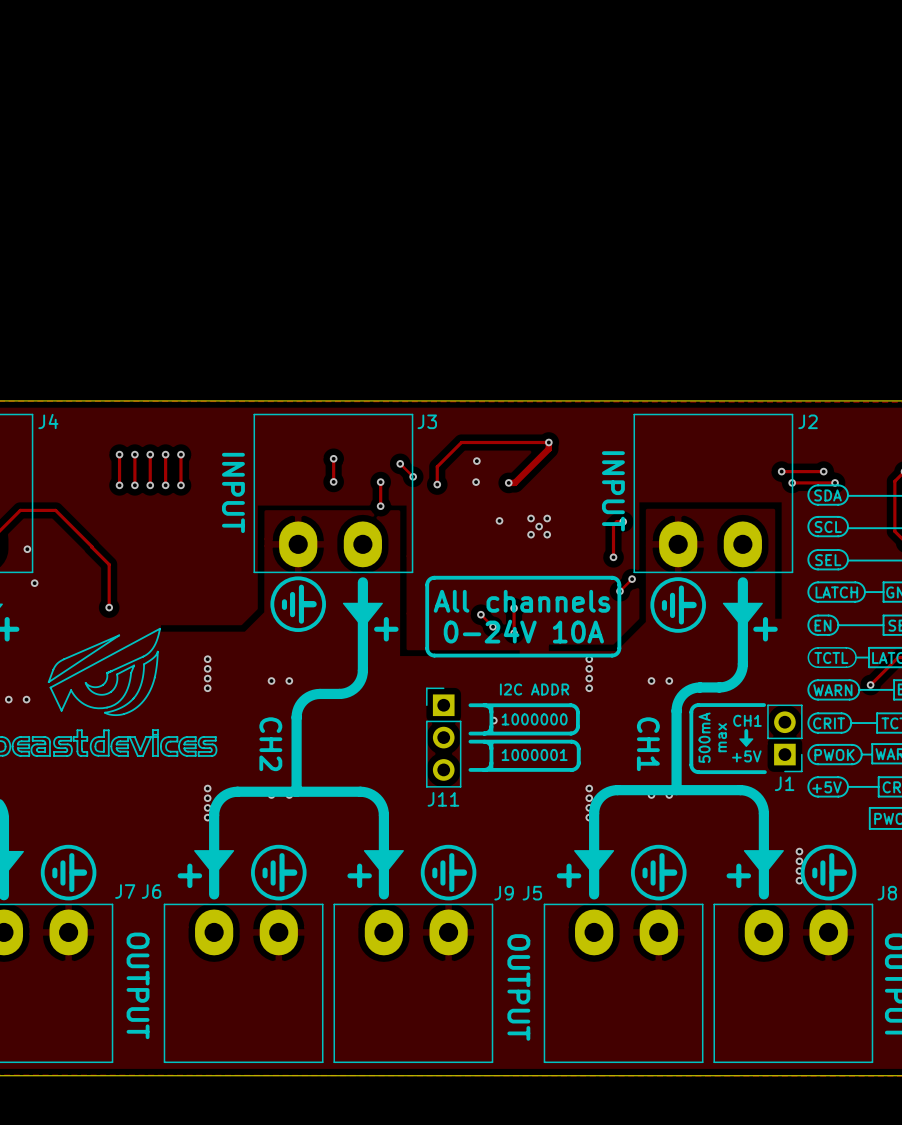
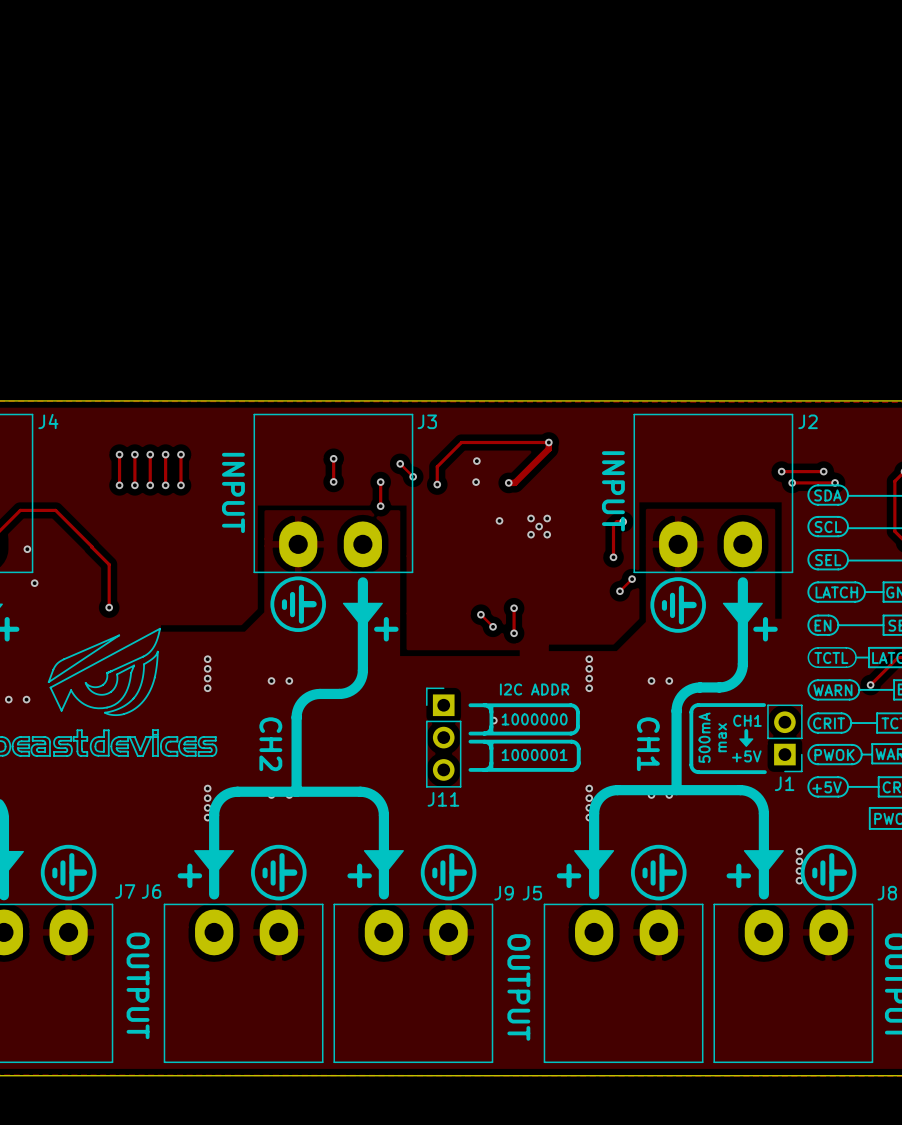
line: (434, 577) (614, 578) (619, 585) (618, 651) (612, 655) (431, 655) (427, 648) (427, 585) (429, 579) (434, 577) -> none
text: All channels (522, 601) -> none
text: 0-24V 10A (523, 631) -> none

